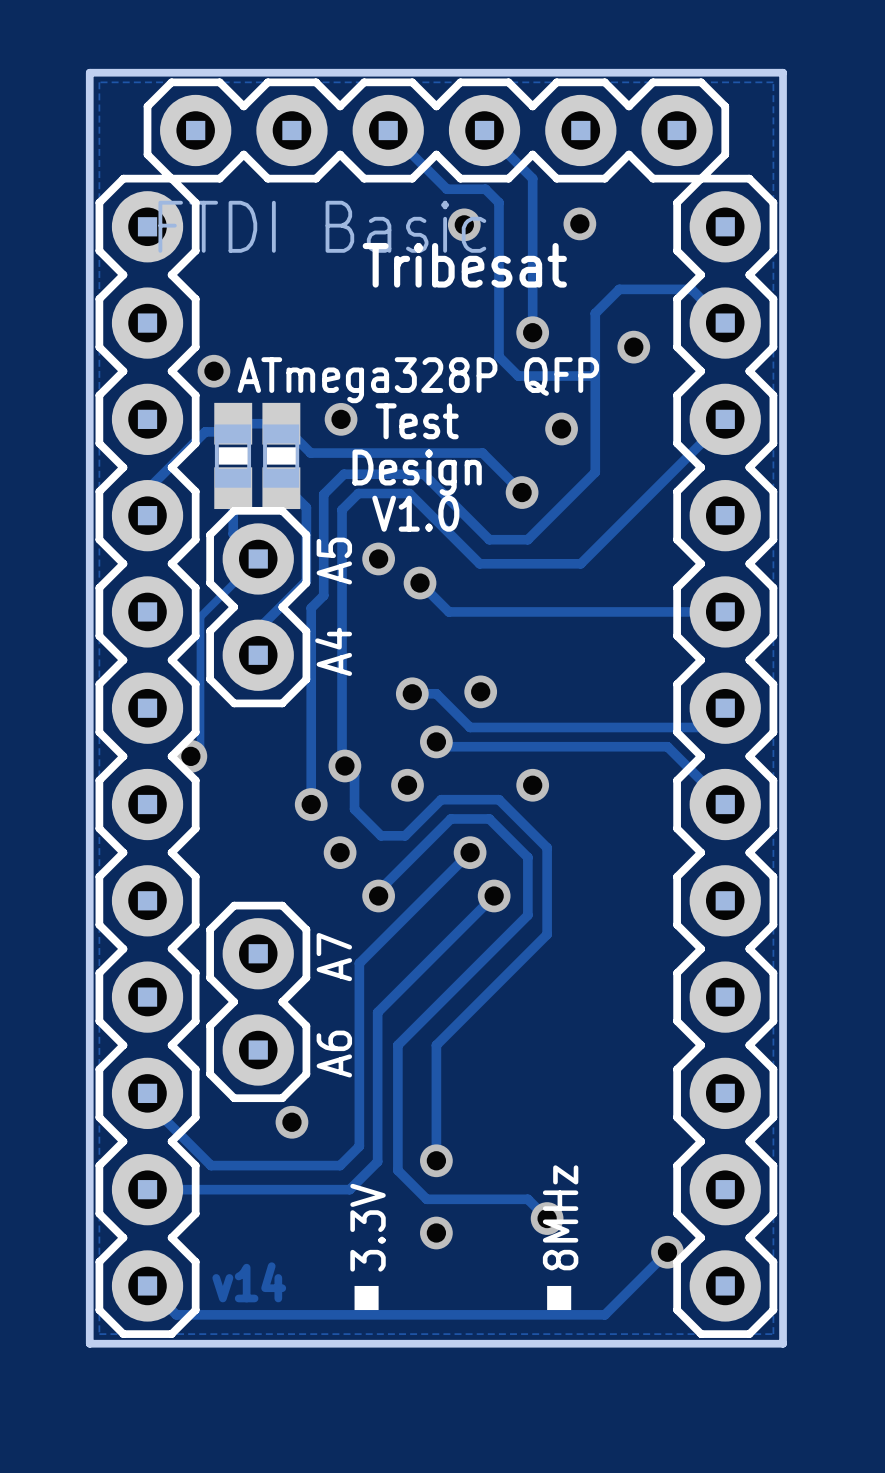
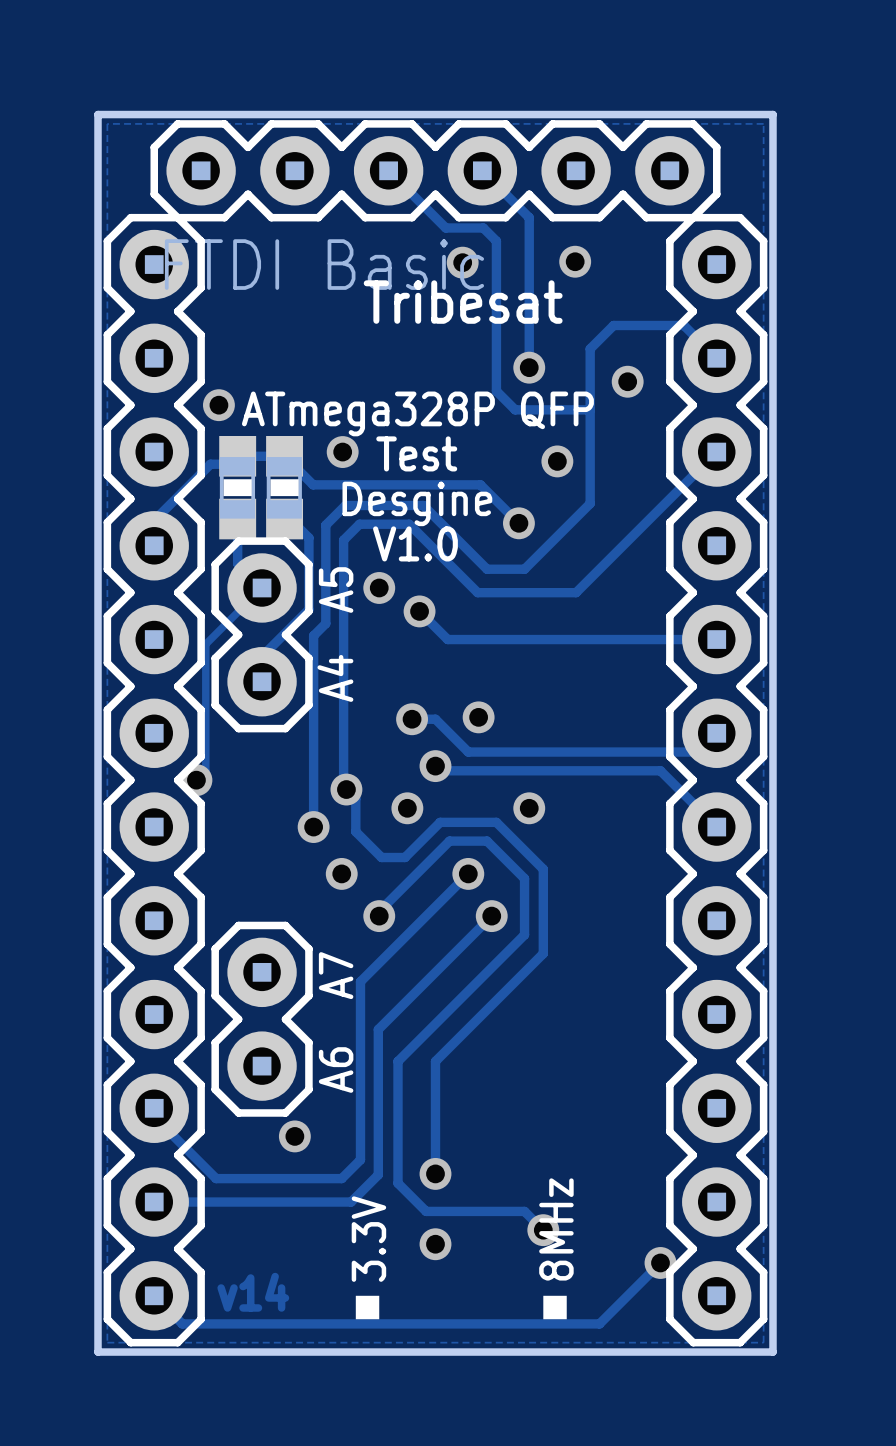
text: Design (417, 472) -> Desgine (417, 503)

